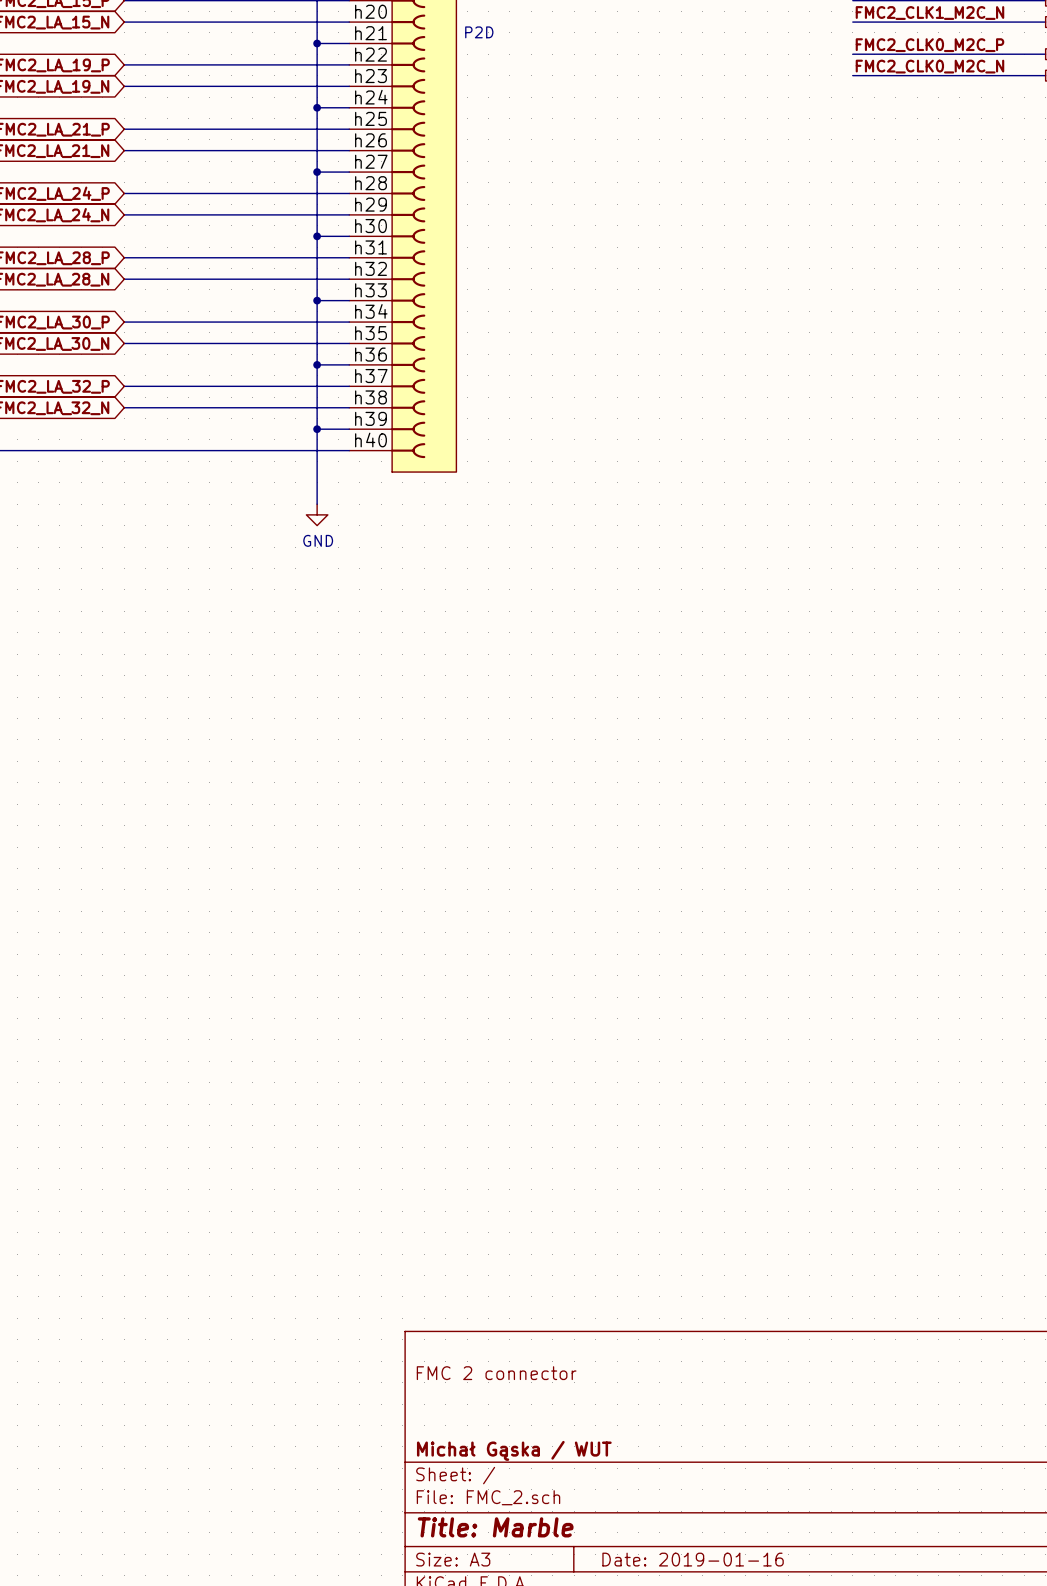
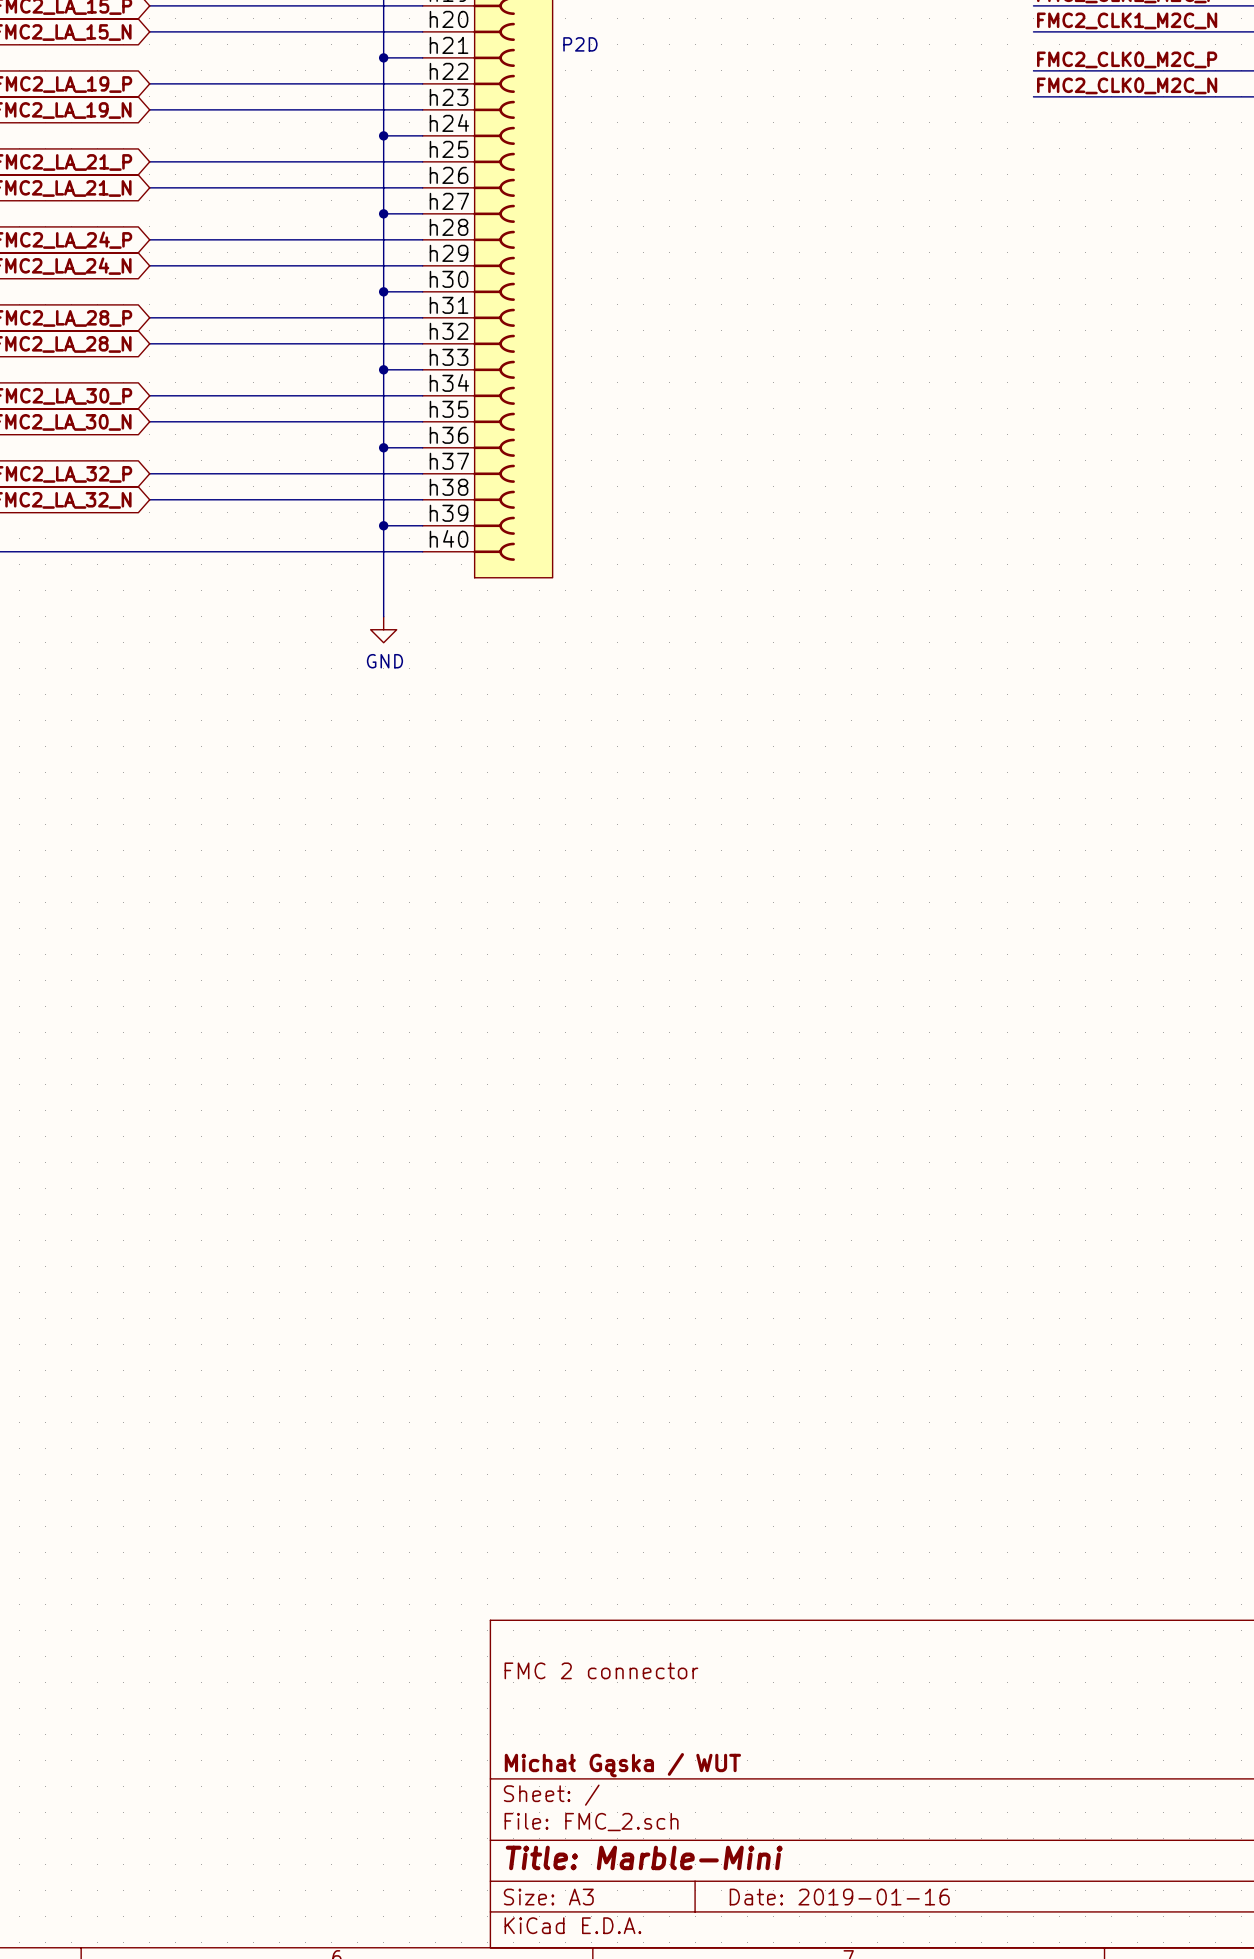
title block: Title: Marble (495, 1527) -> Title: Marble-Mini (644, 1857)

